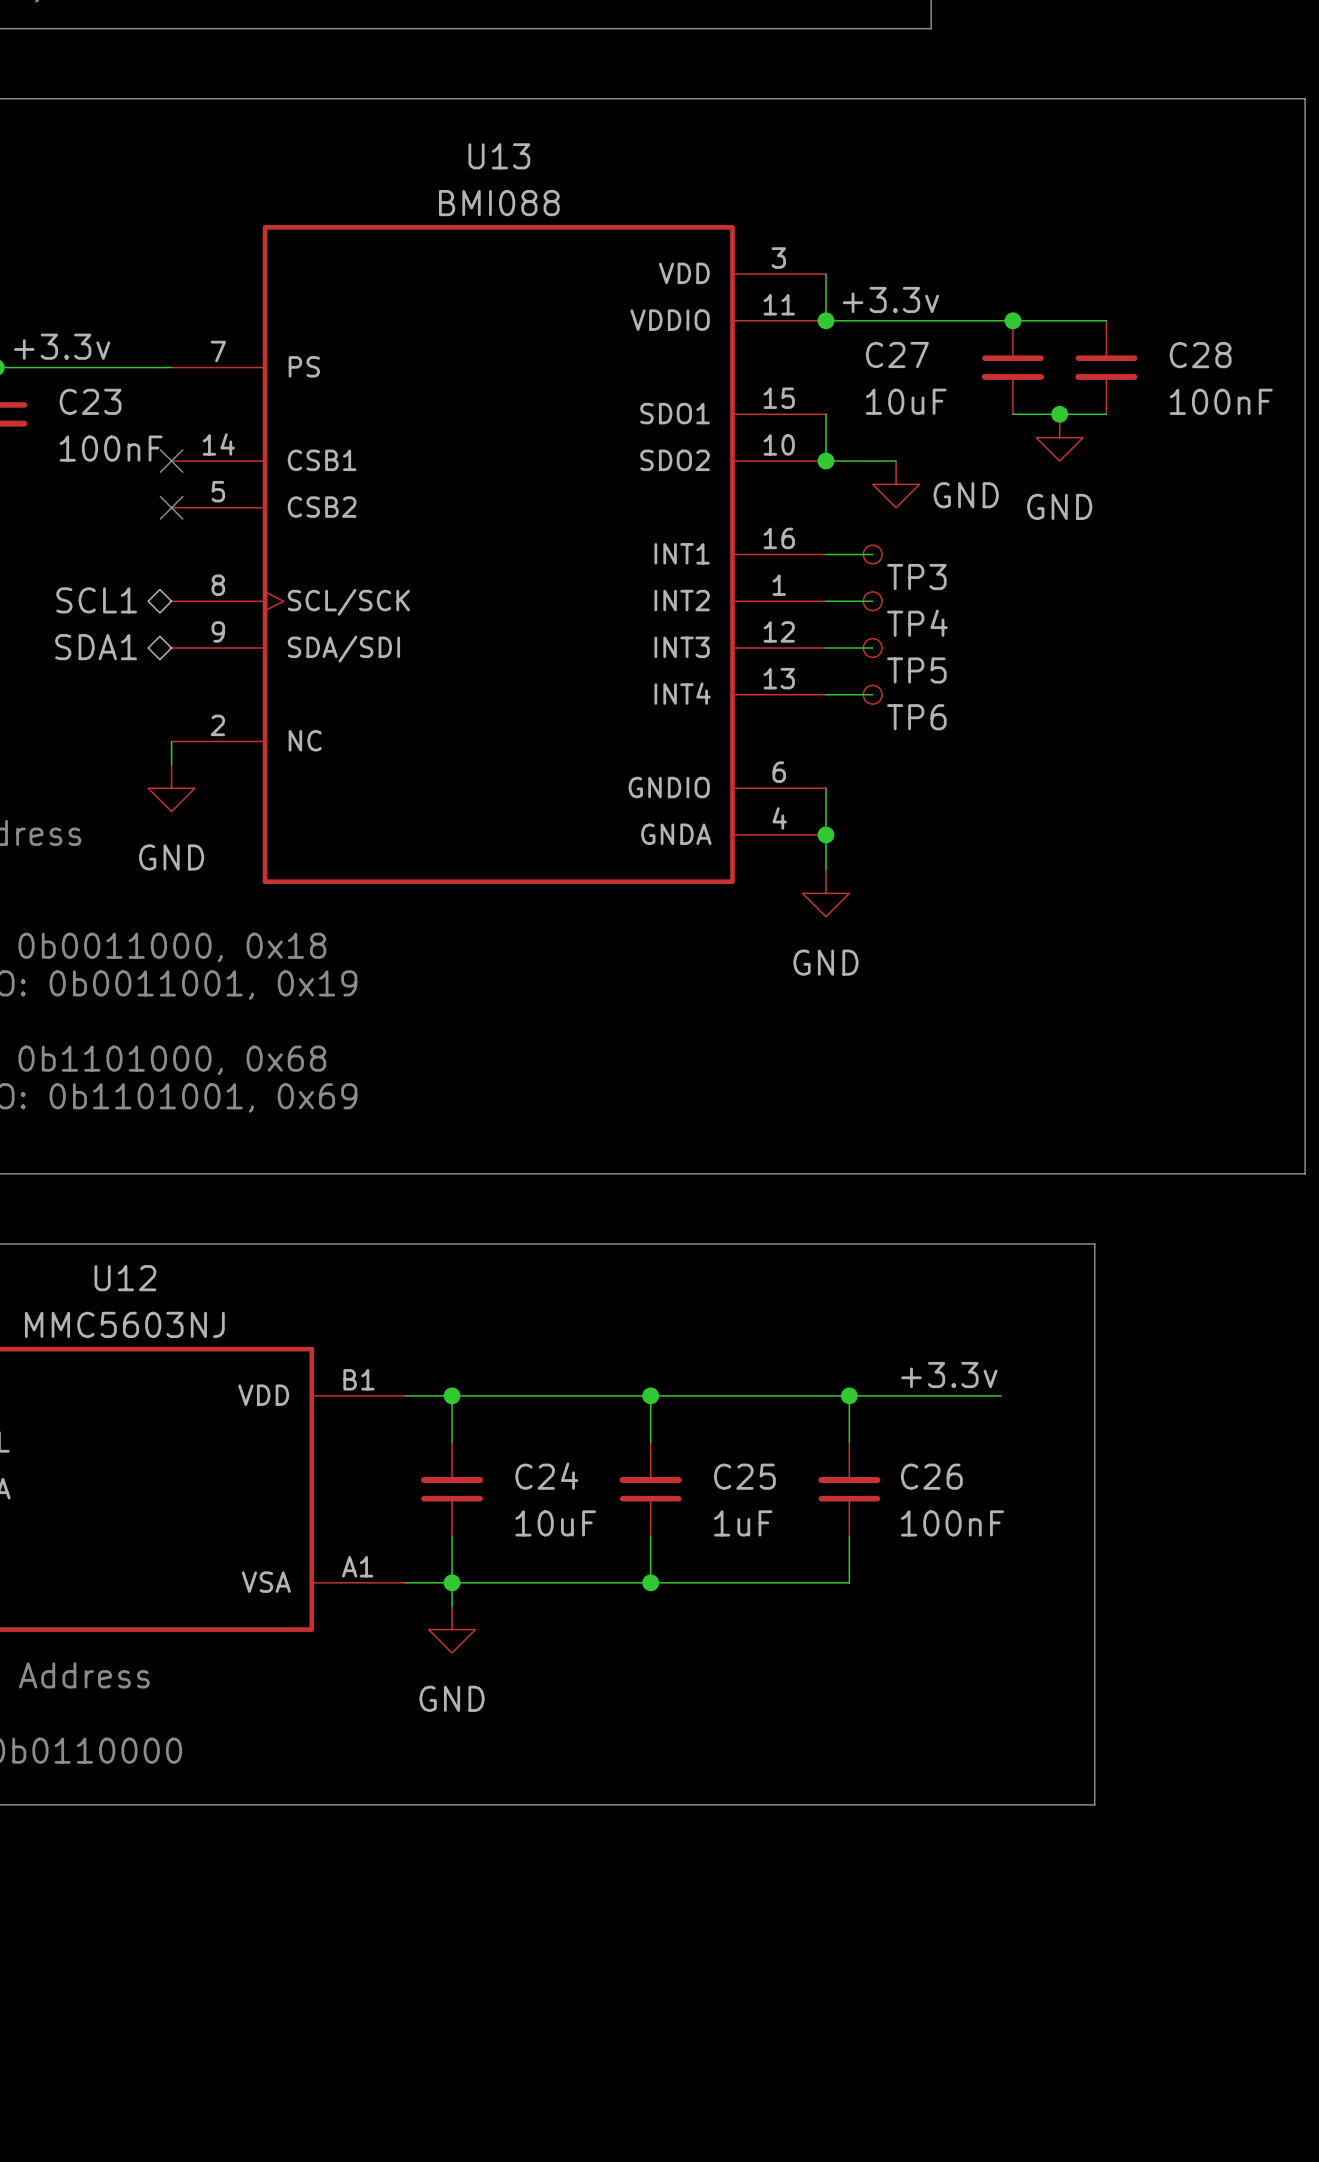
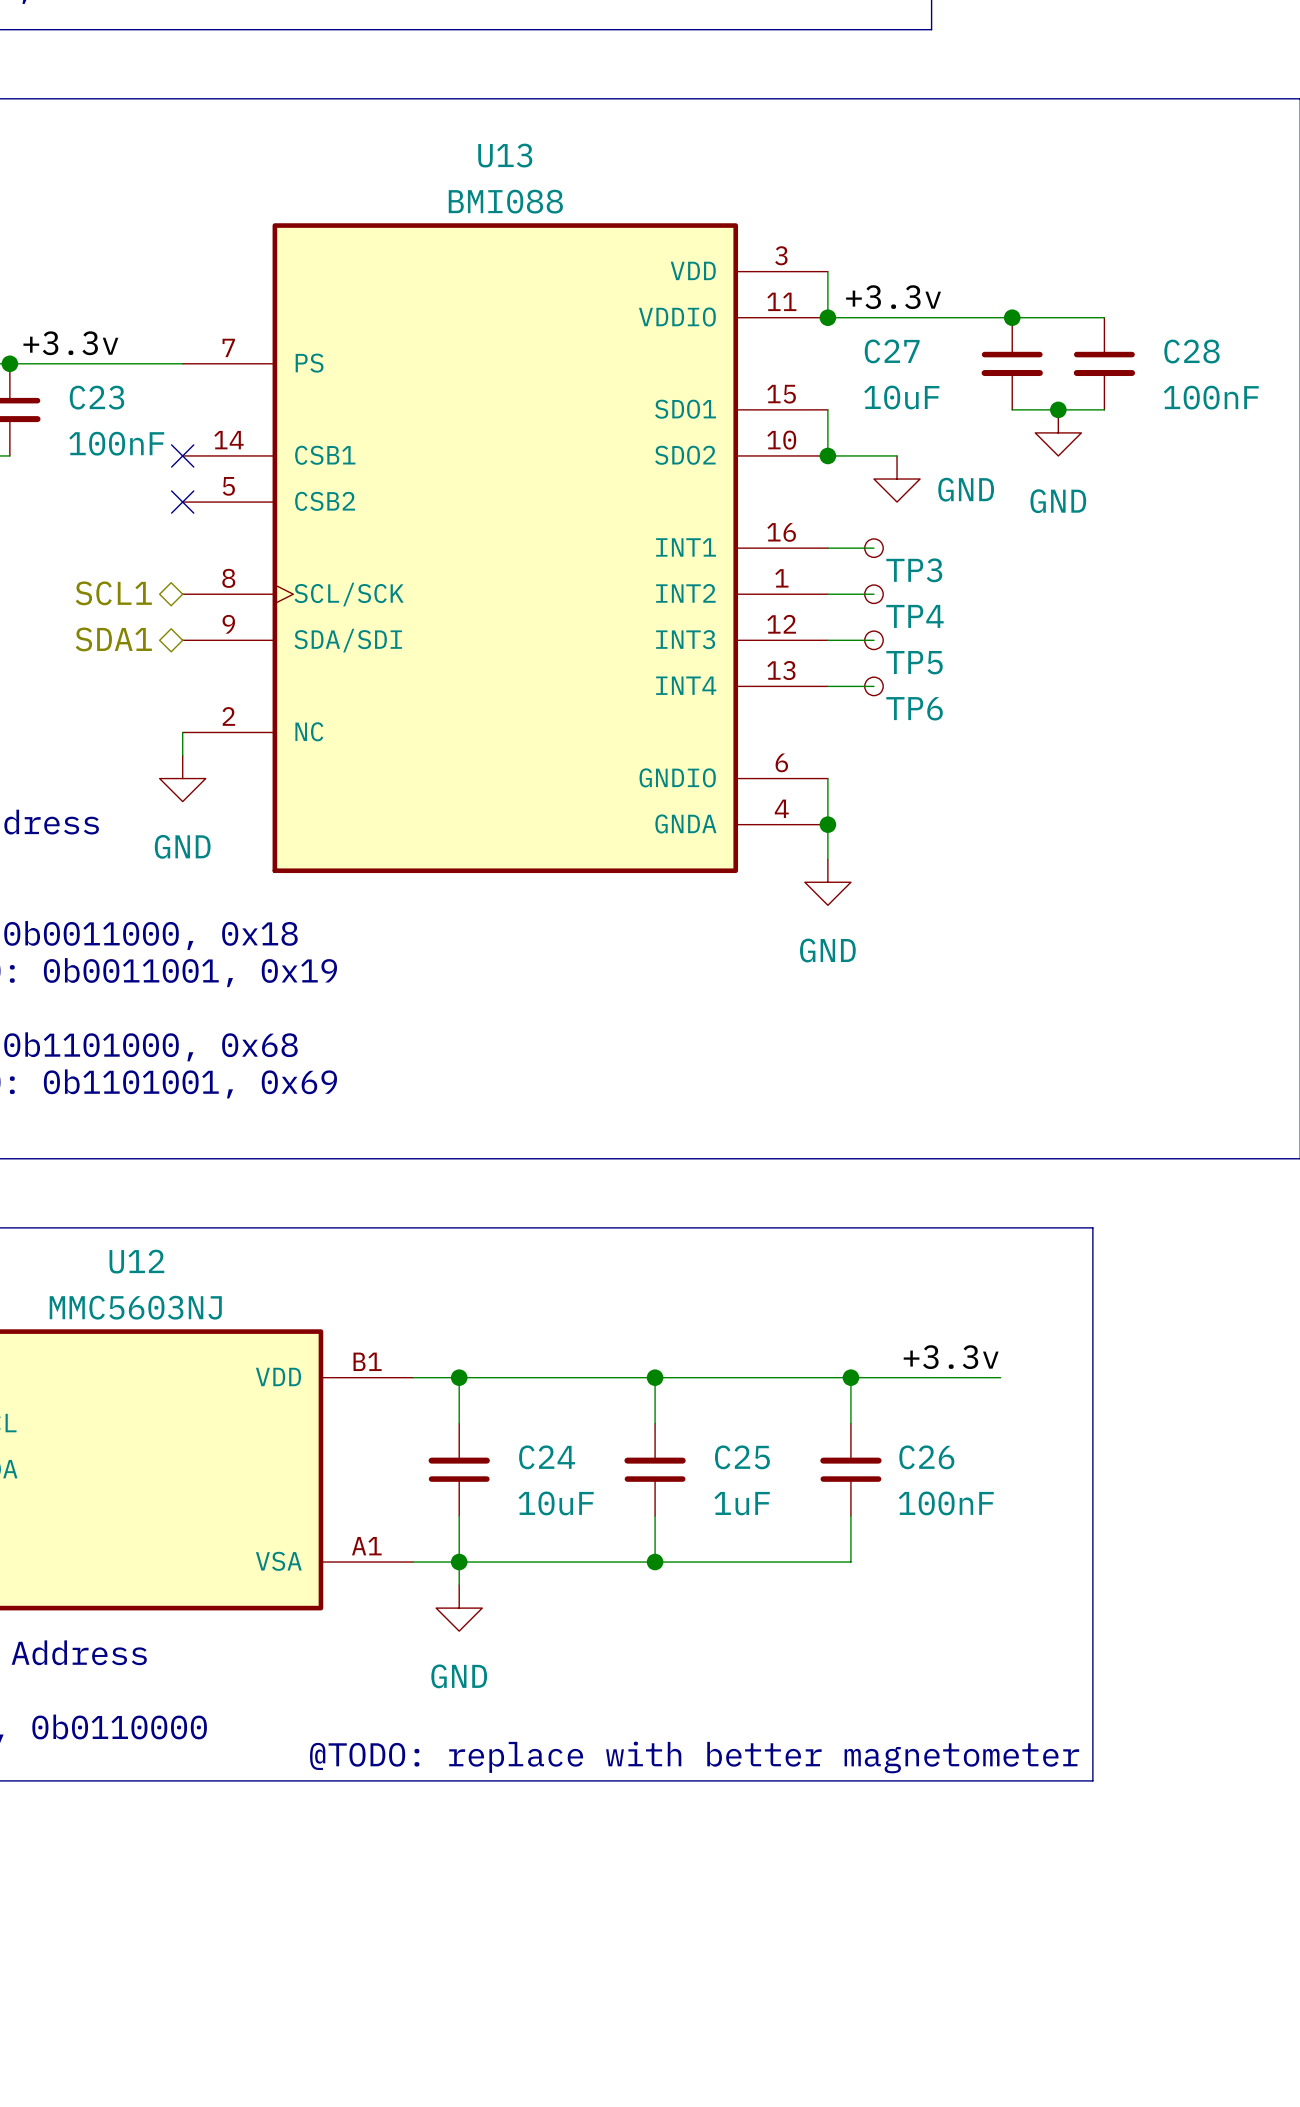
text: none -> @TODO: replace with better magnetometer (694, 1757)

